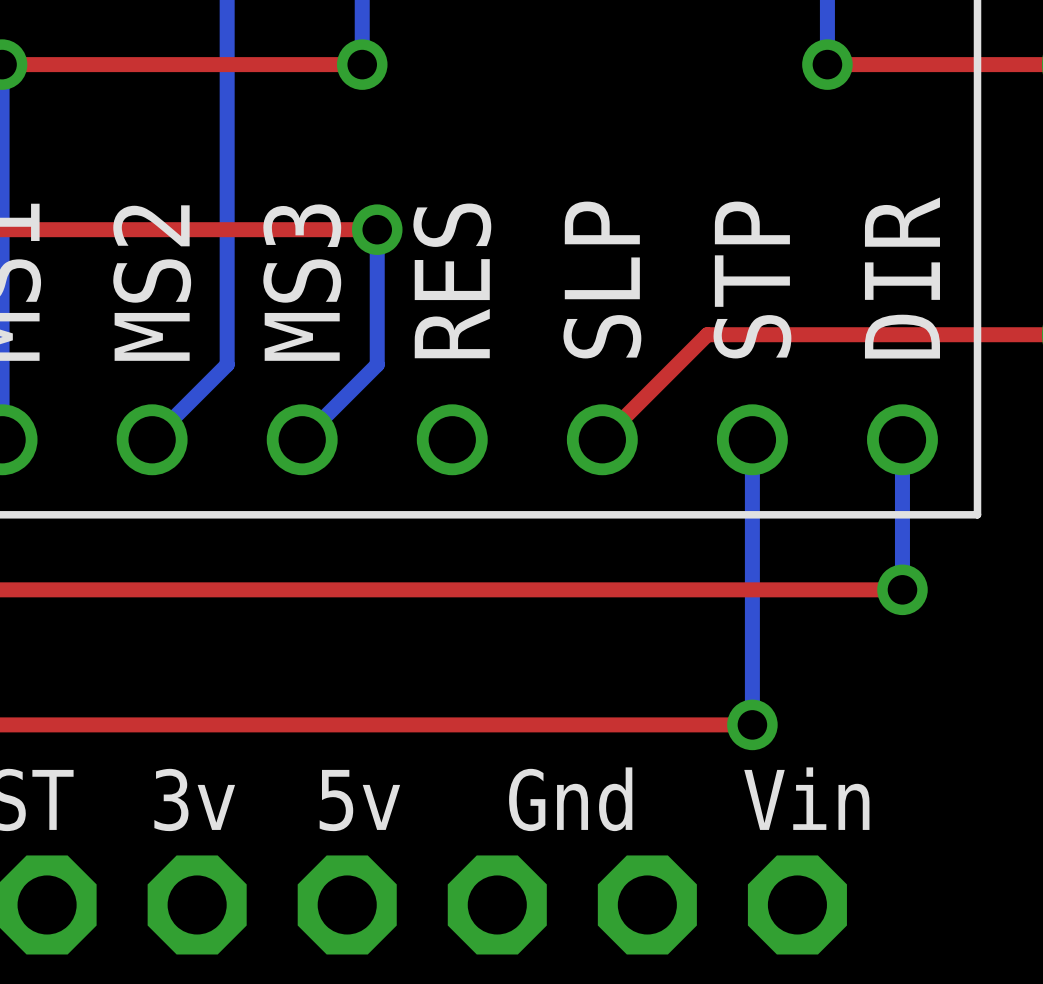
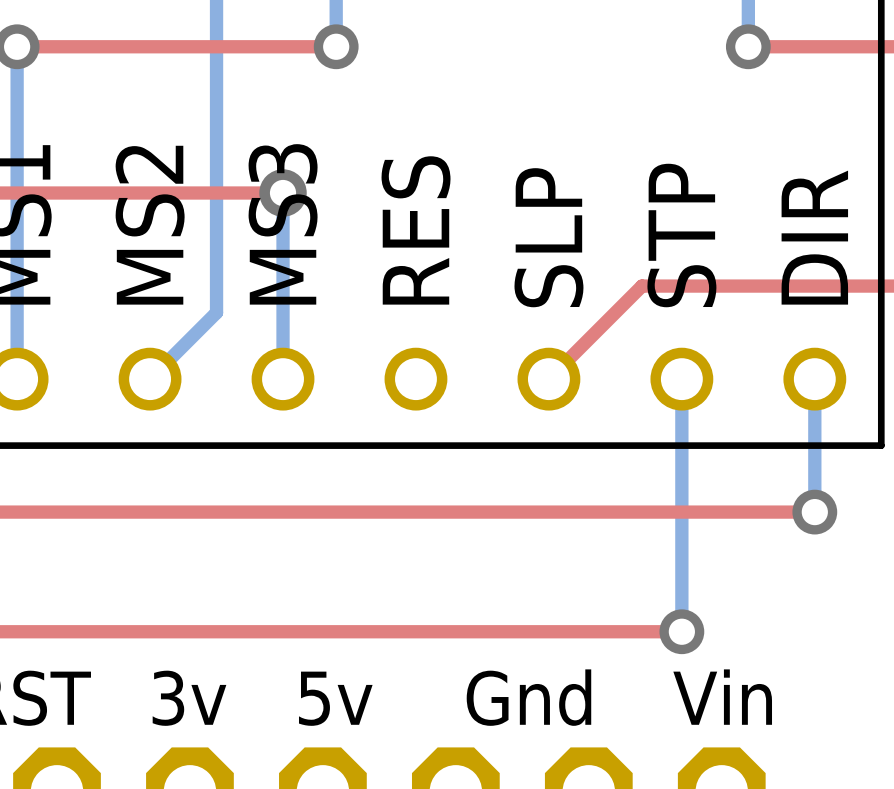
top track: (302, 229) (377, 229) -> none
via: none -> (283, 193)
bottom track: (377, 229) (377, 364) (302, 439) -> (283, 193) (283, 379)
via: (377, 229) -> none

